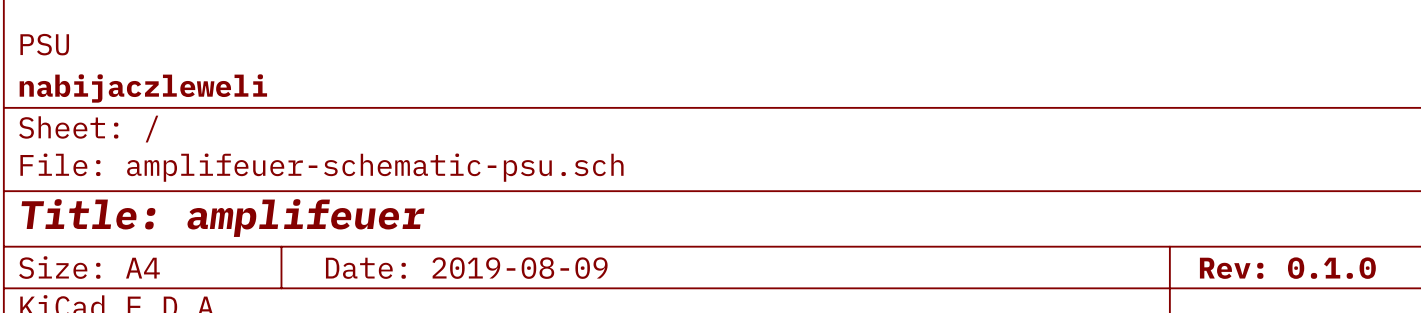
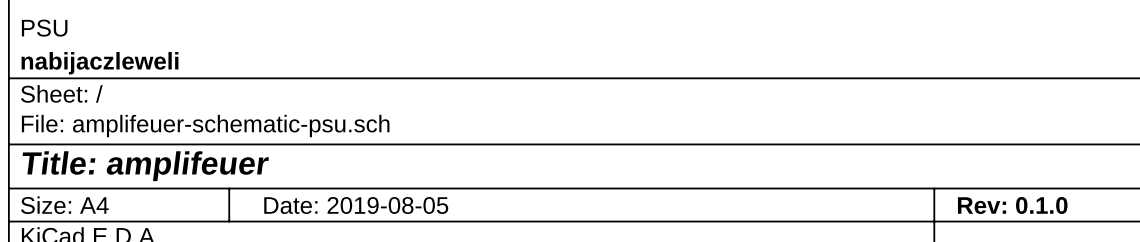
title block: Date: 2019-08-09 (466, 268) -> Date: 2019-08-05 (356, 205)

